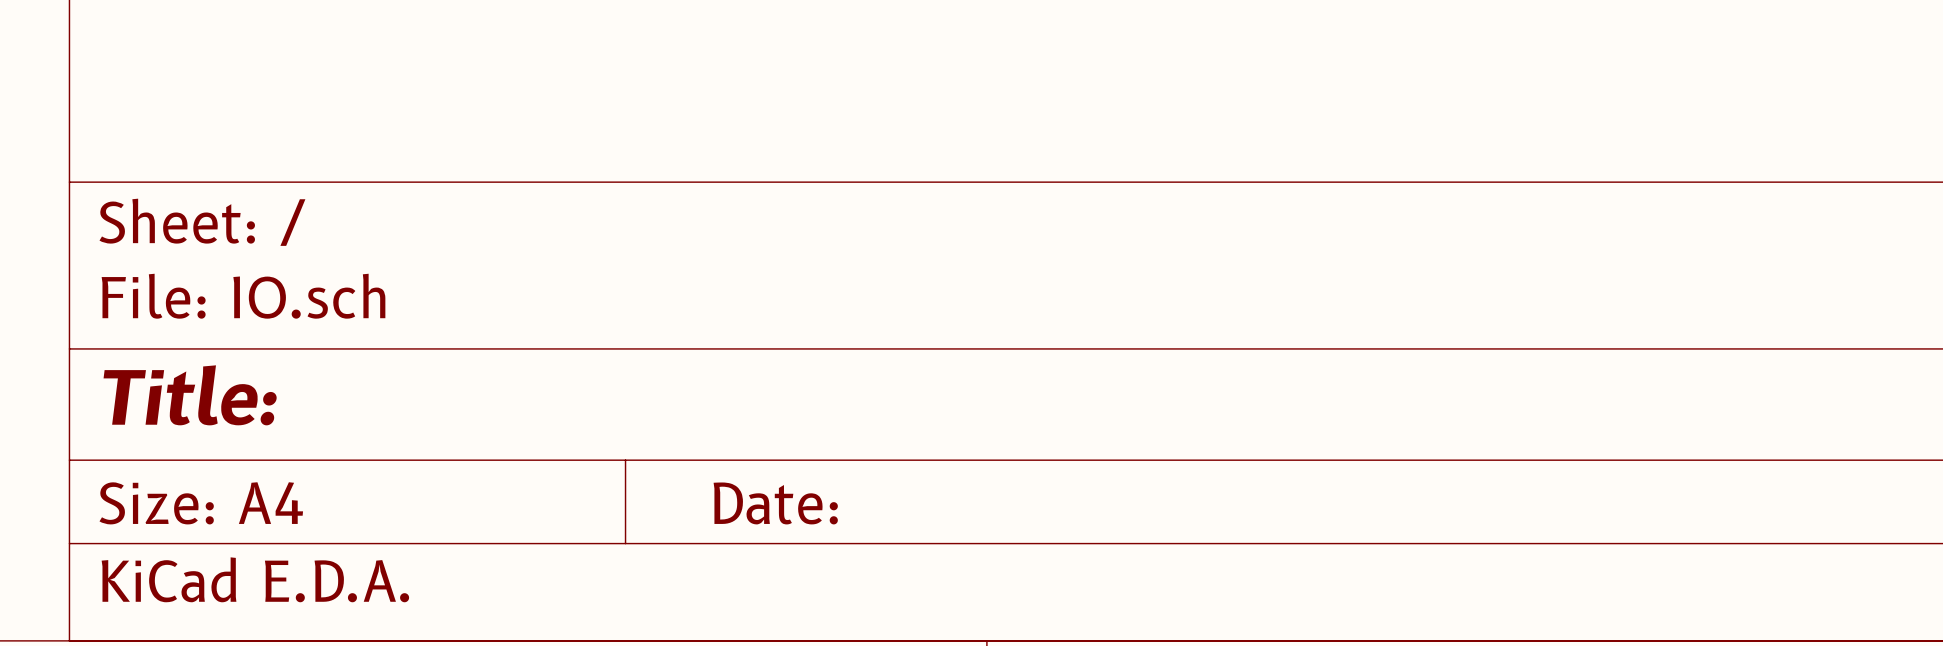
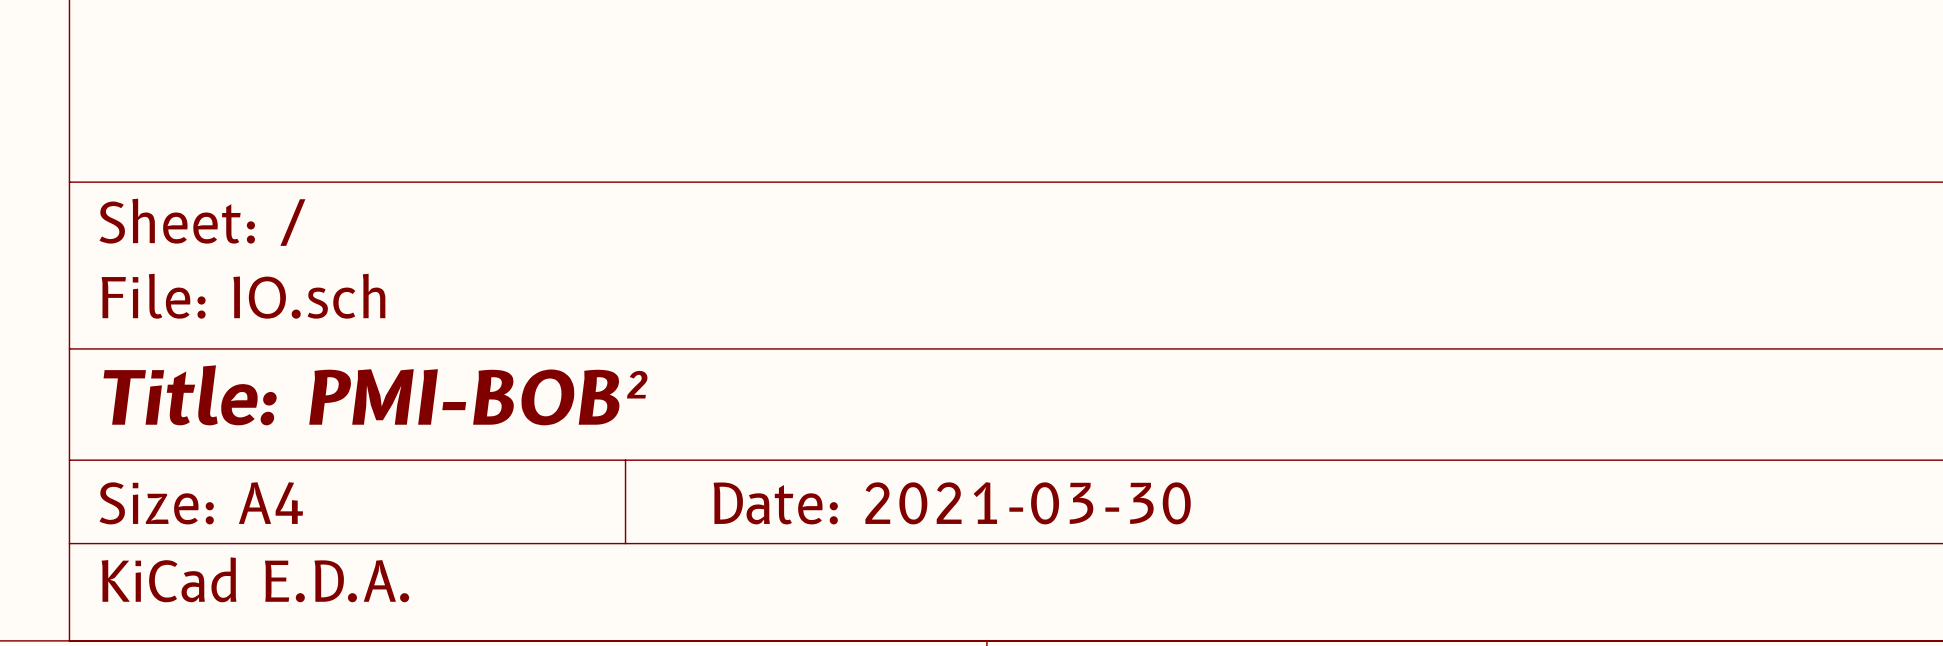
title block: Title: (190, 395) -> Title: PMI-BOB² (375, 395)
title block: Date: (775, 503) -> Date: 2021-03-30 (952, 503)

